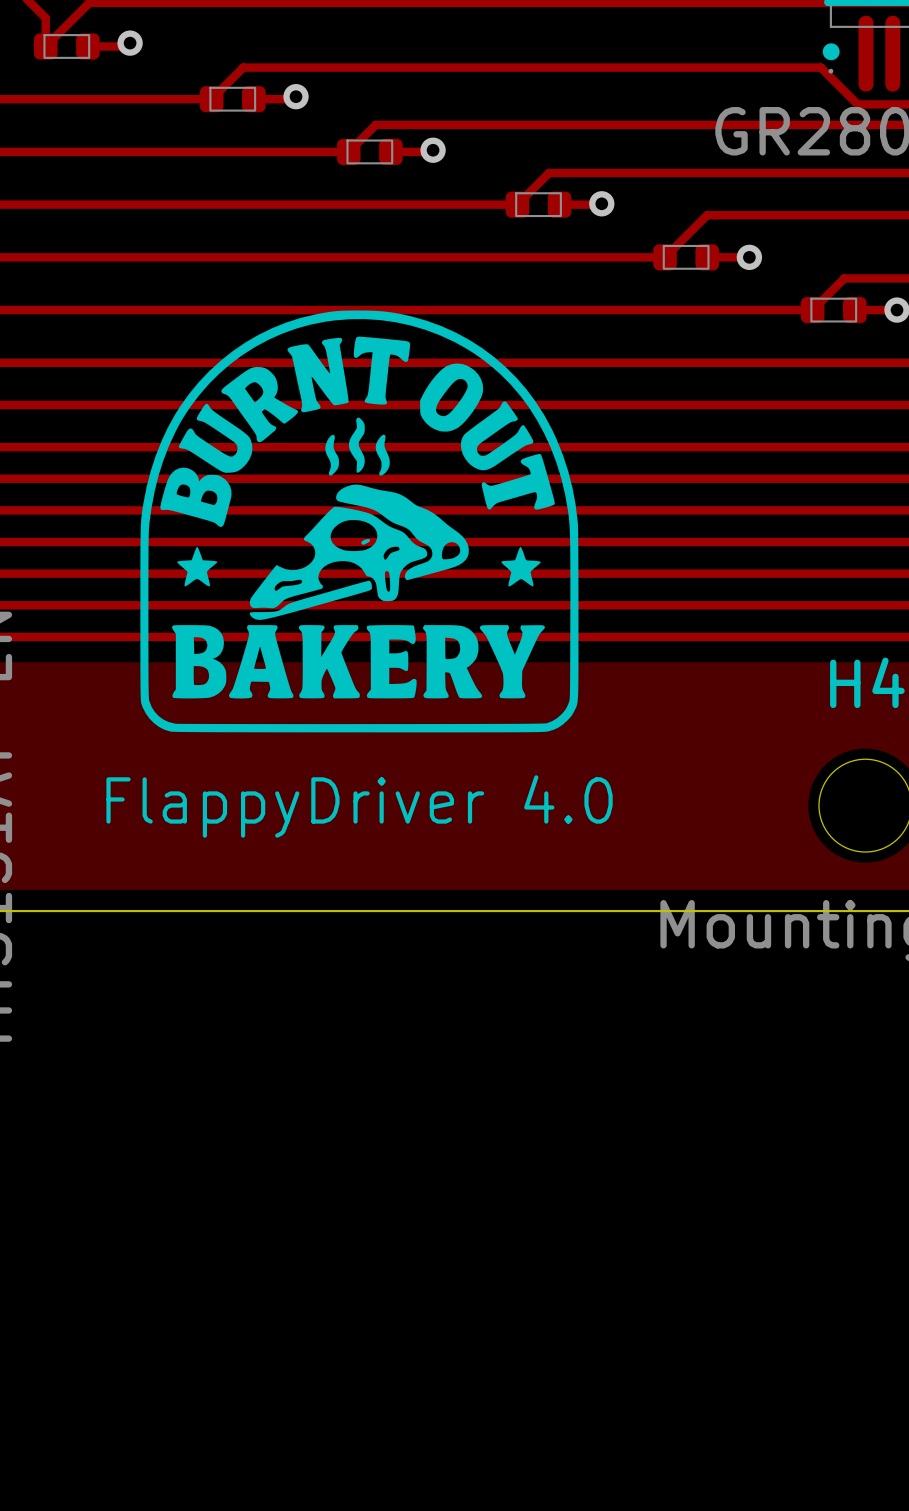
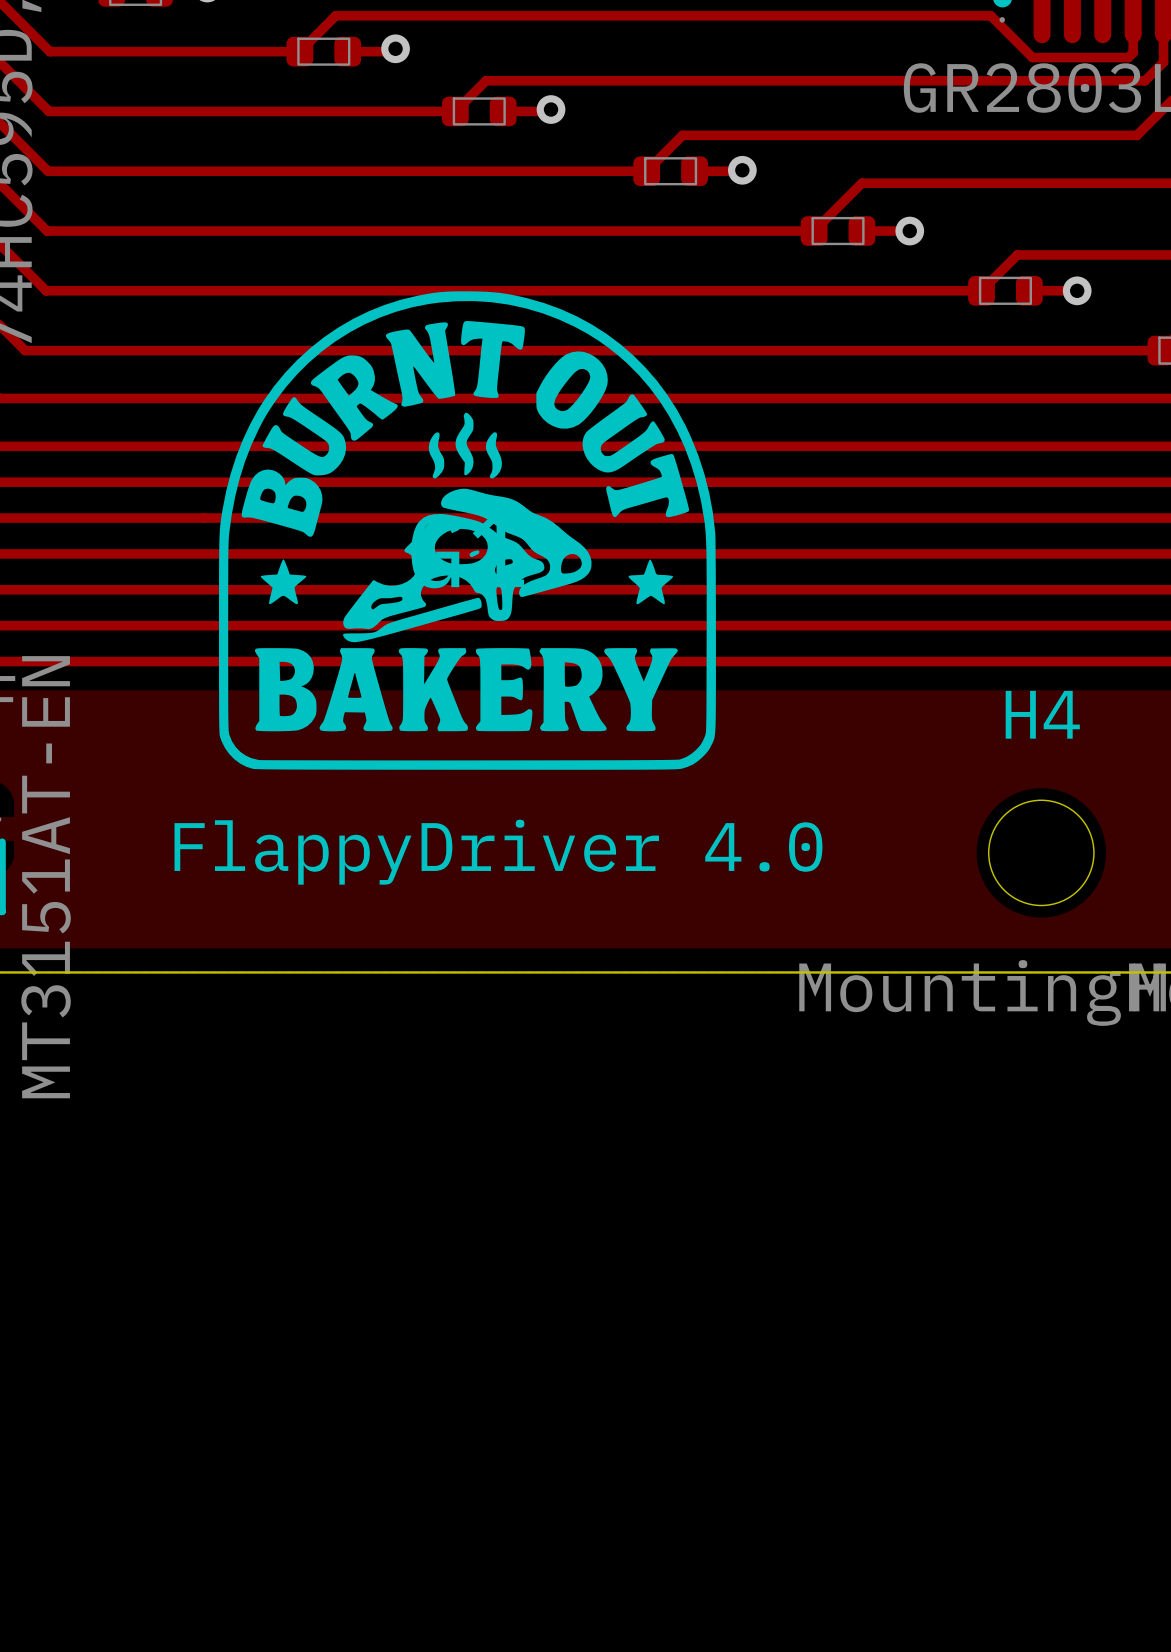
drawing: [140, 310, 579, 733] -> none
part: none -> (467, 530)

